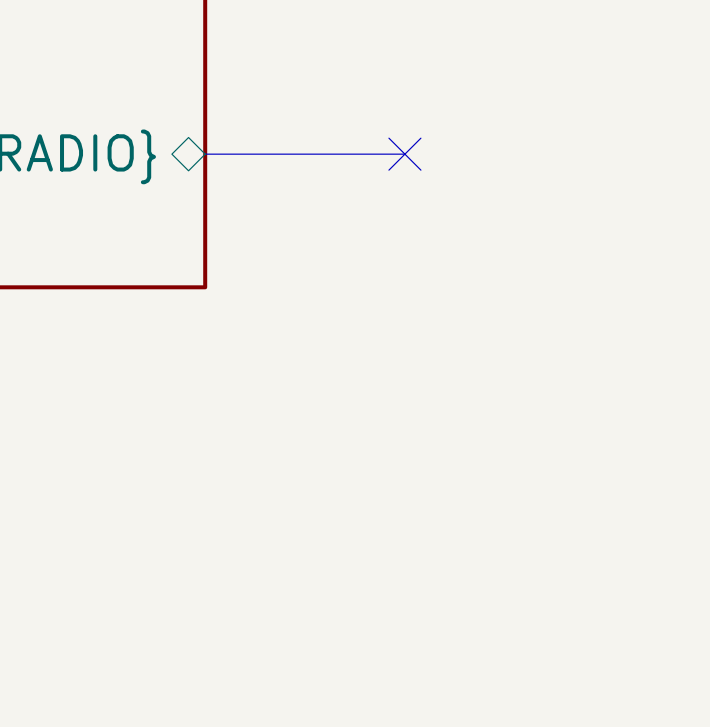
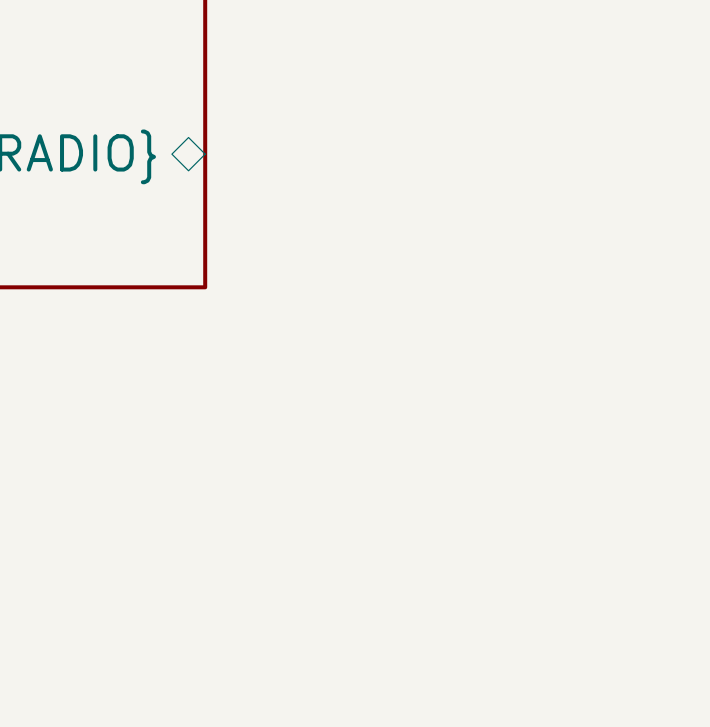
bus: (205, 154) (404, 154) -> none
no-connect mark: (404, 154) -> none

